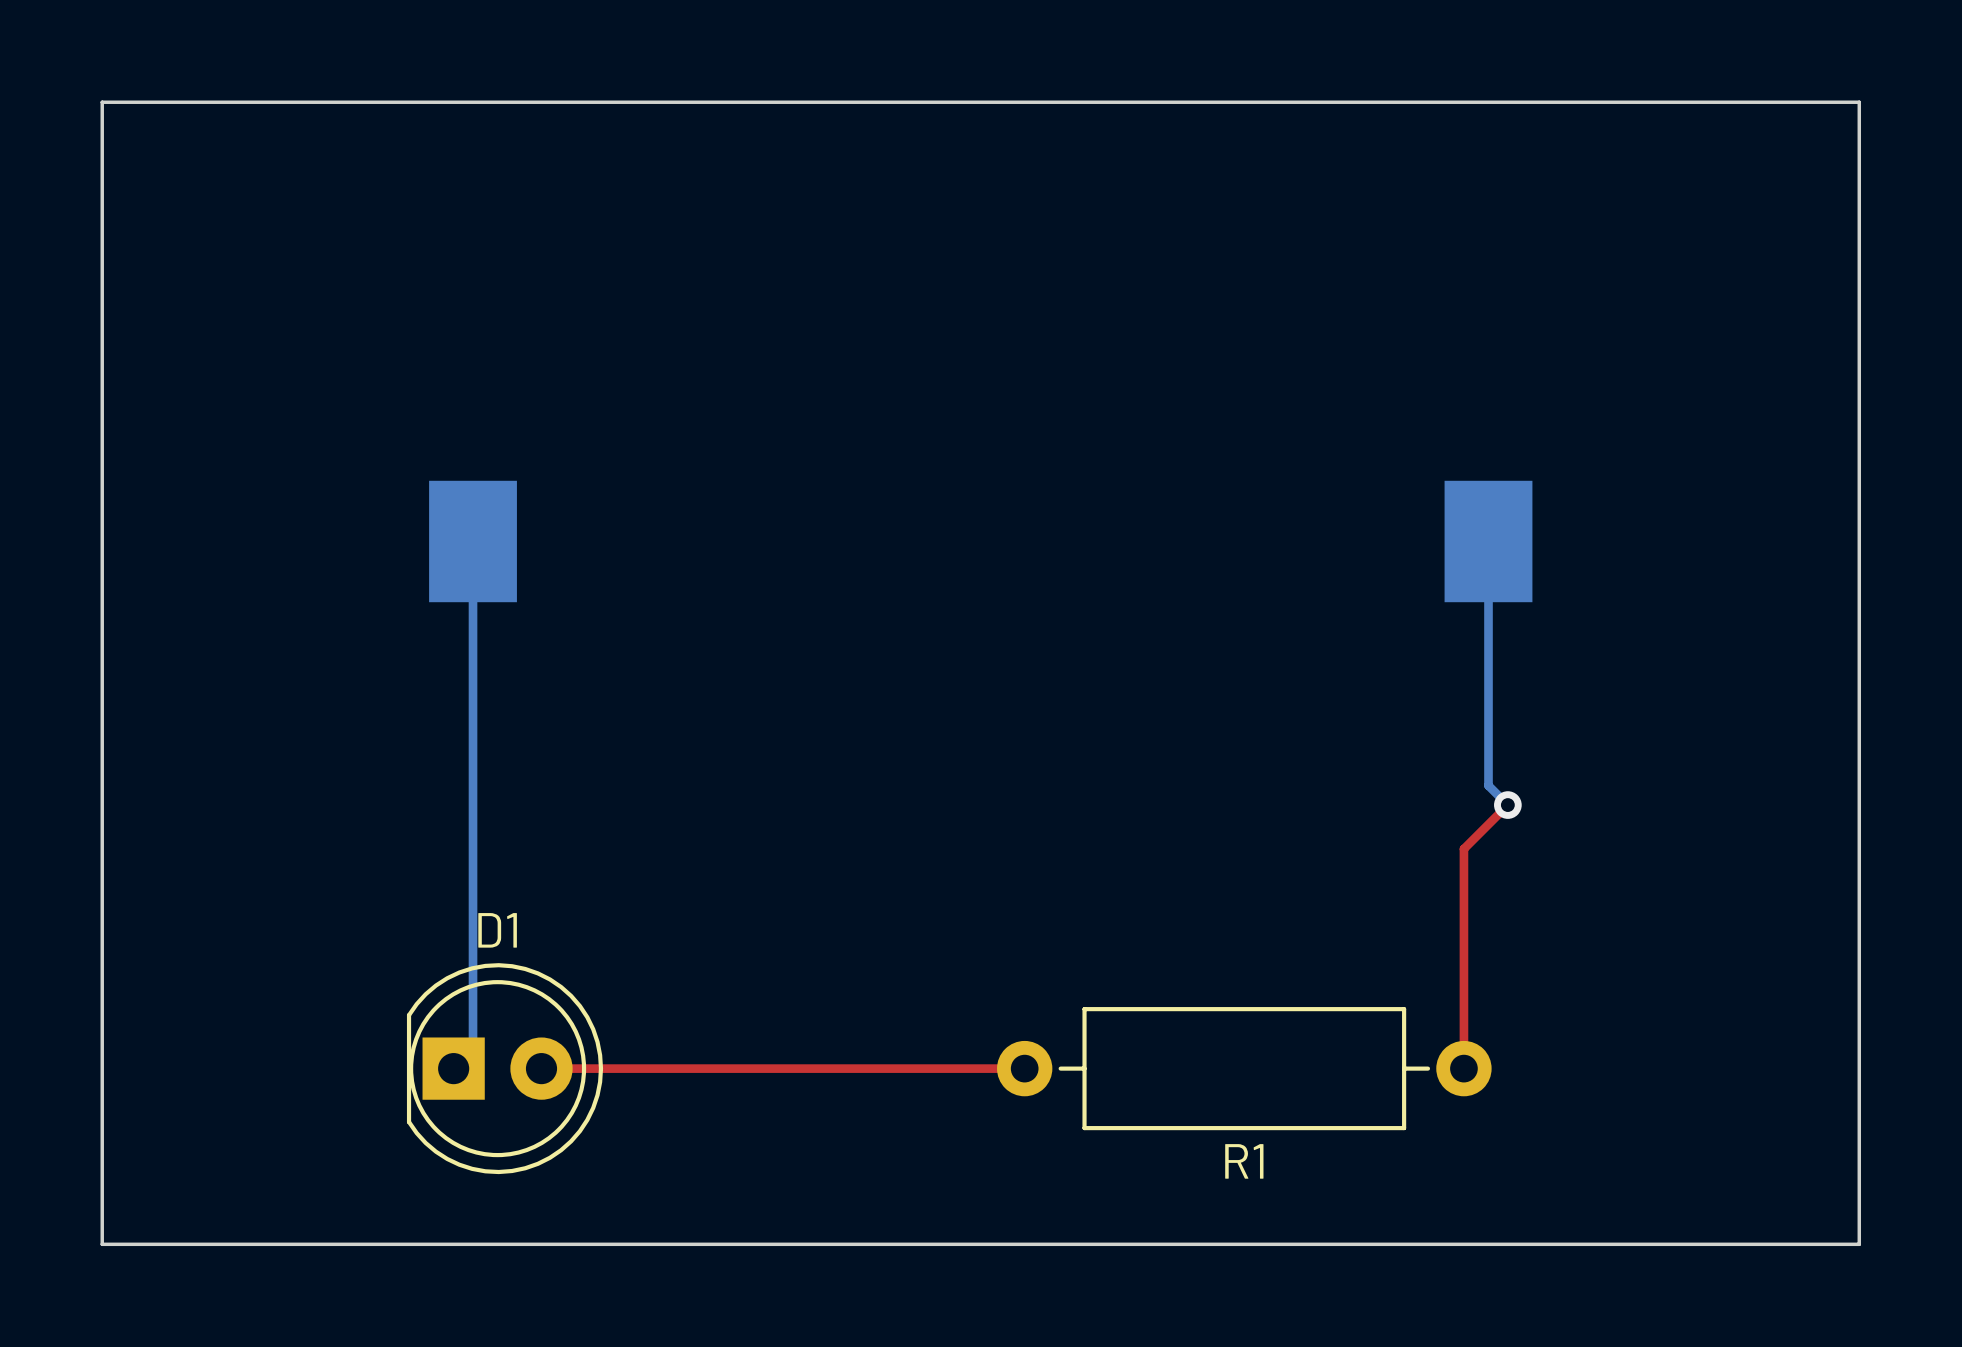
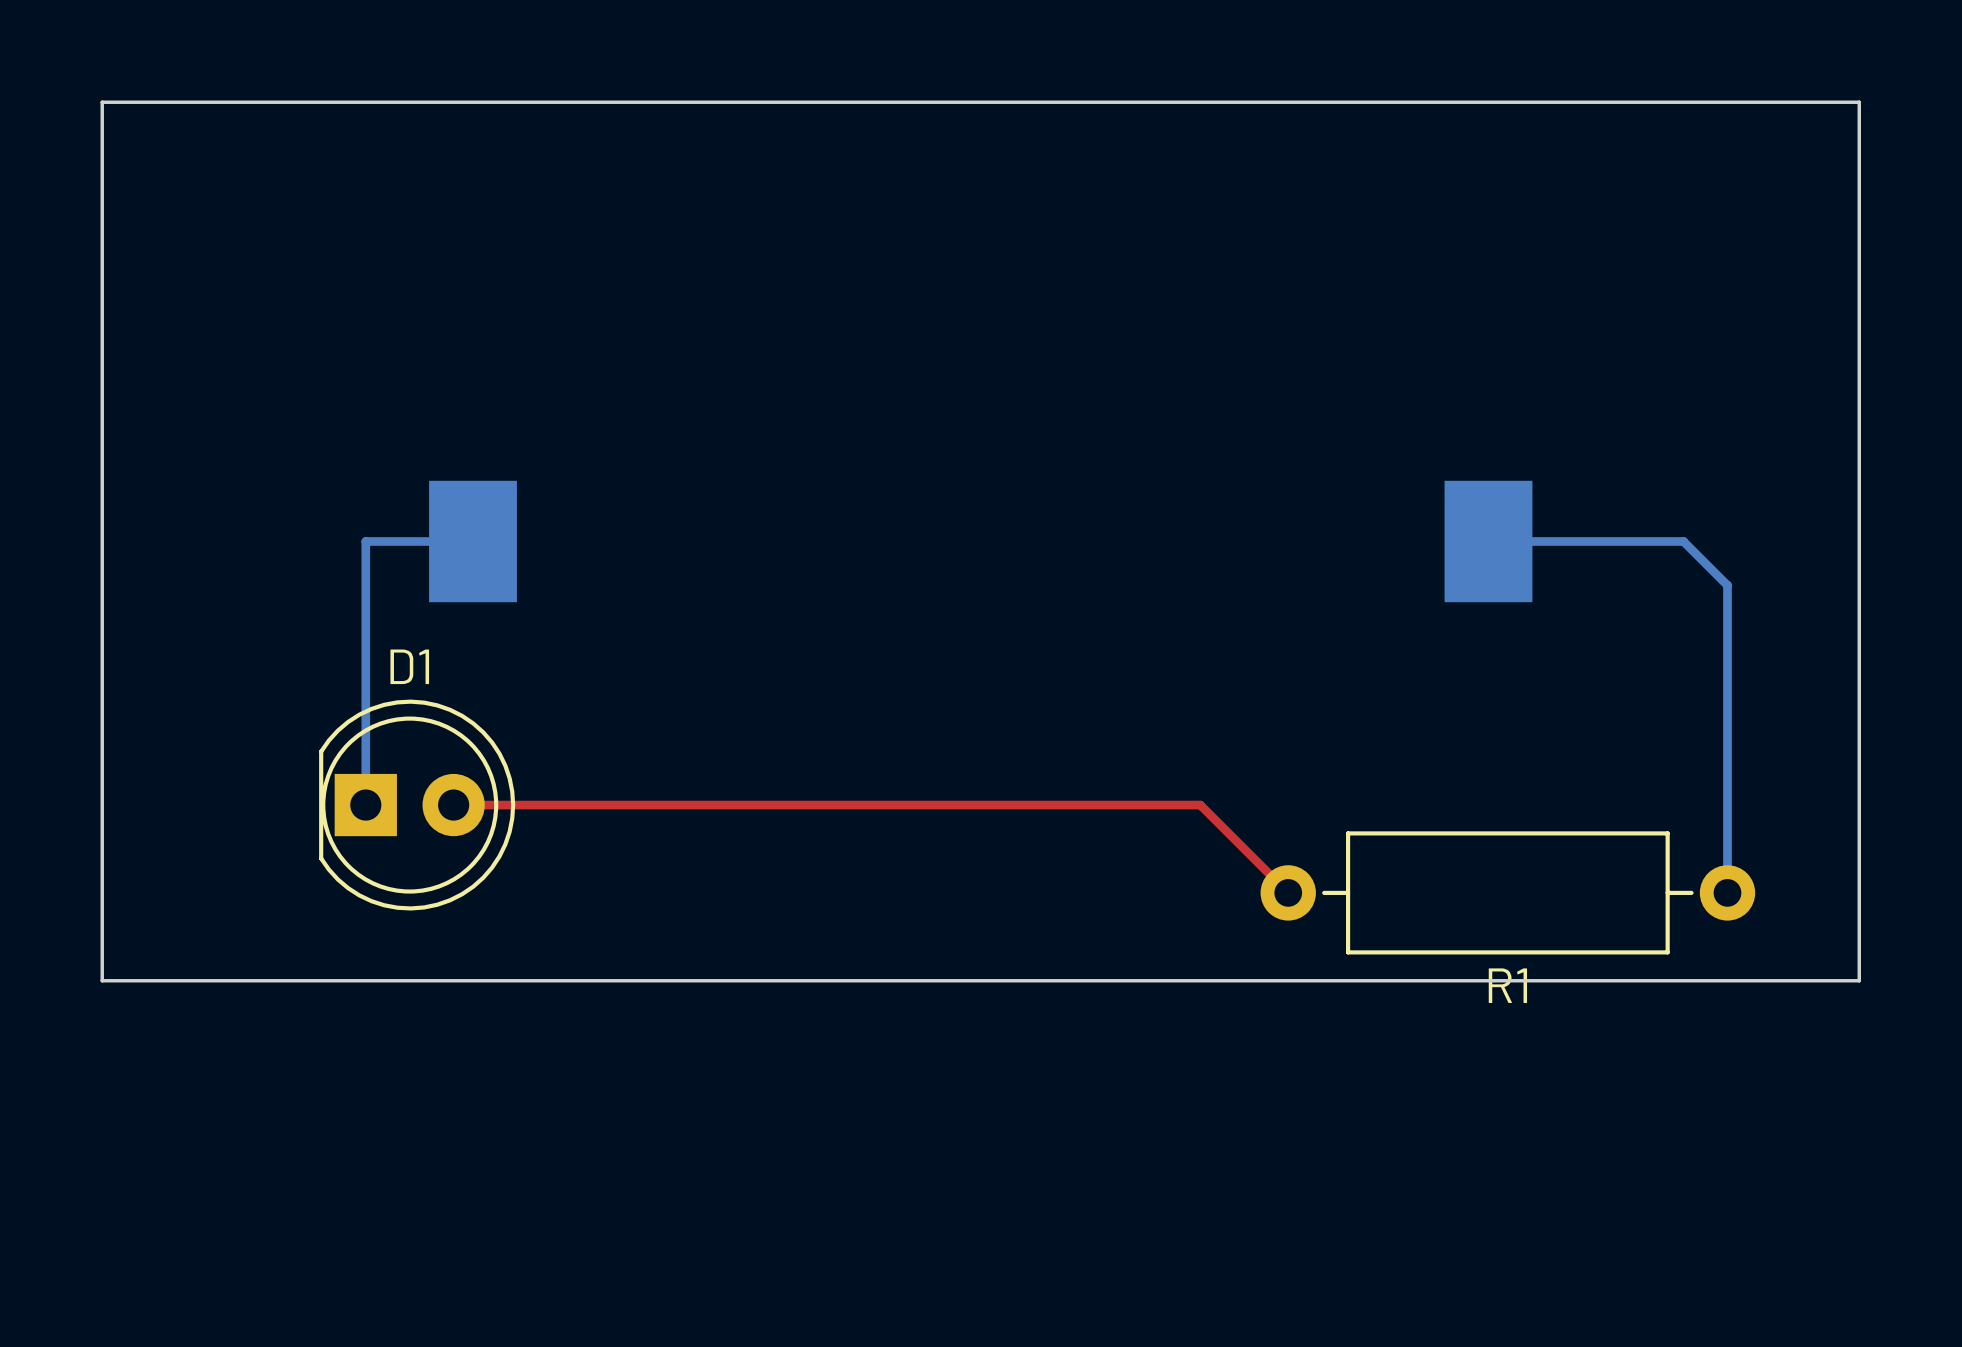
bottom track: (473, 541) (473, 1049) (453, 1068) -> (473, 541) (365, 541) (365, 805)
bottom track: (1488, 541) (1488, 785) (1507, 805) -> (1488, 541) (1683, 541) (1727, 585) (1727, 892)
top track: none -> (453, 805) (1200, 805) (1288, 892)
top track: (1507, 805) (1463, 848) (1463, 1068) -> none
via: (1507, 805) -> none
board edge: (102, 980) (102, 1244) (1859, 1244) (1859, 980) -> (102, 980) (1859, 980)
D1 position: (505, 1068) -> (417, 805)
top track: (541, 1068) (1024, 1068) -> none
R1 position: (1244, 1068) -> (1507, 892)

